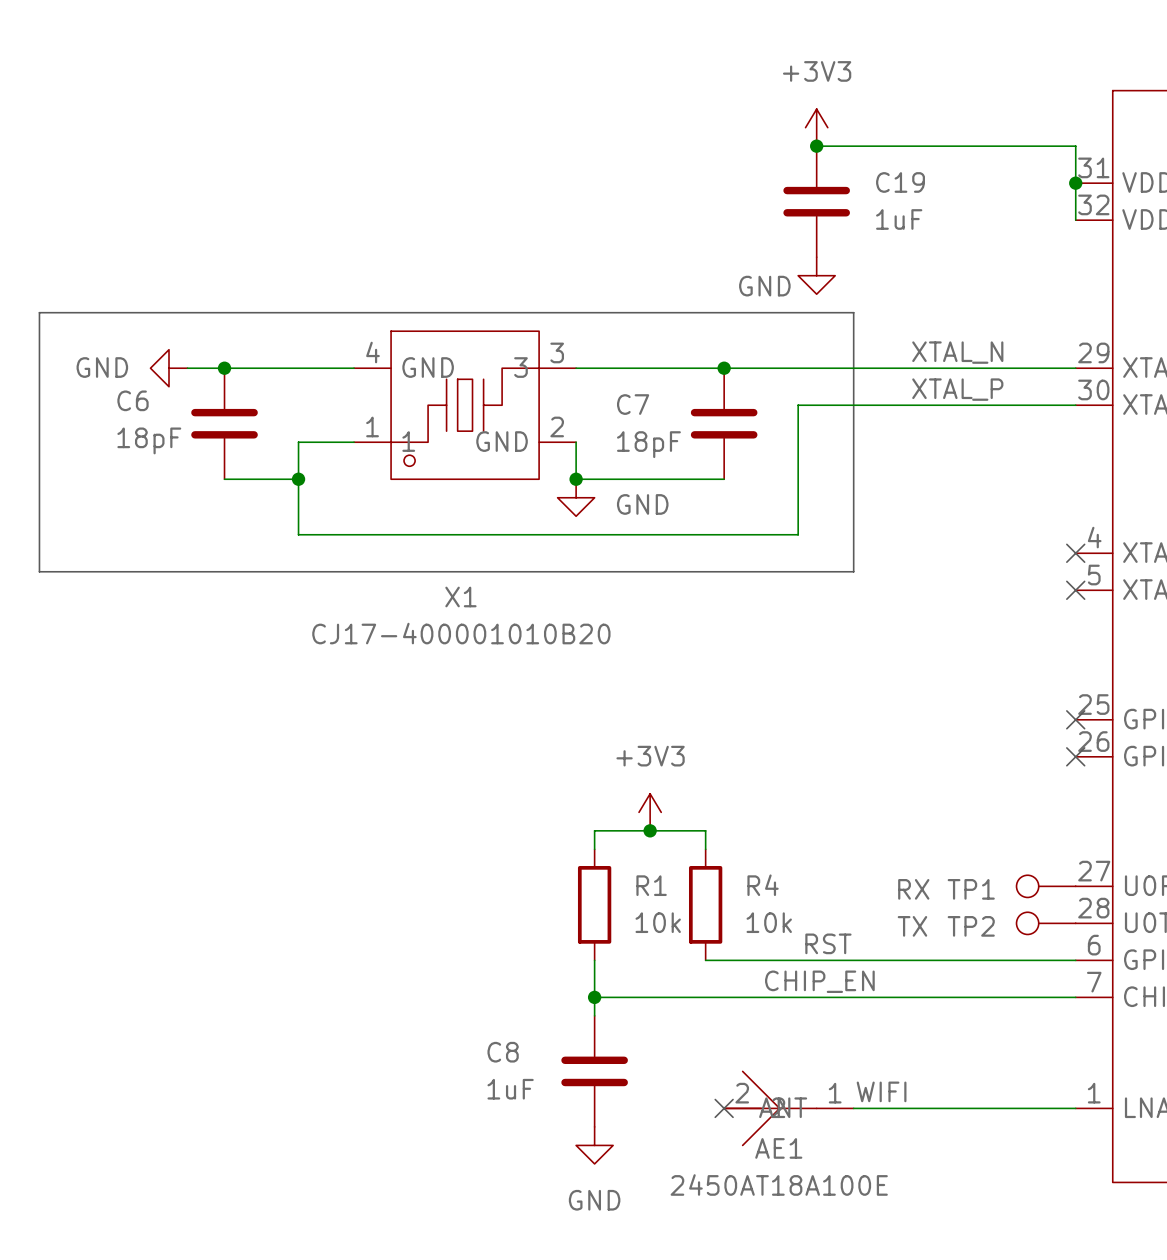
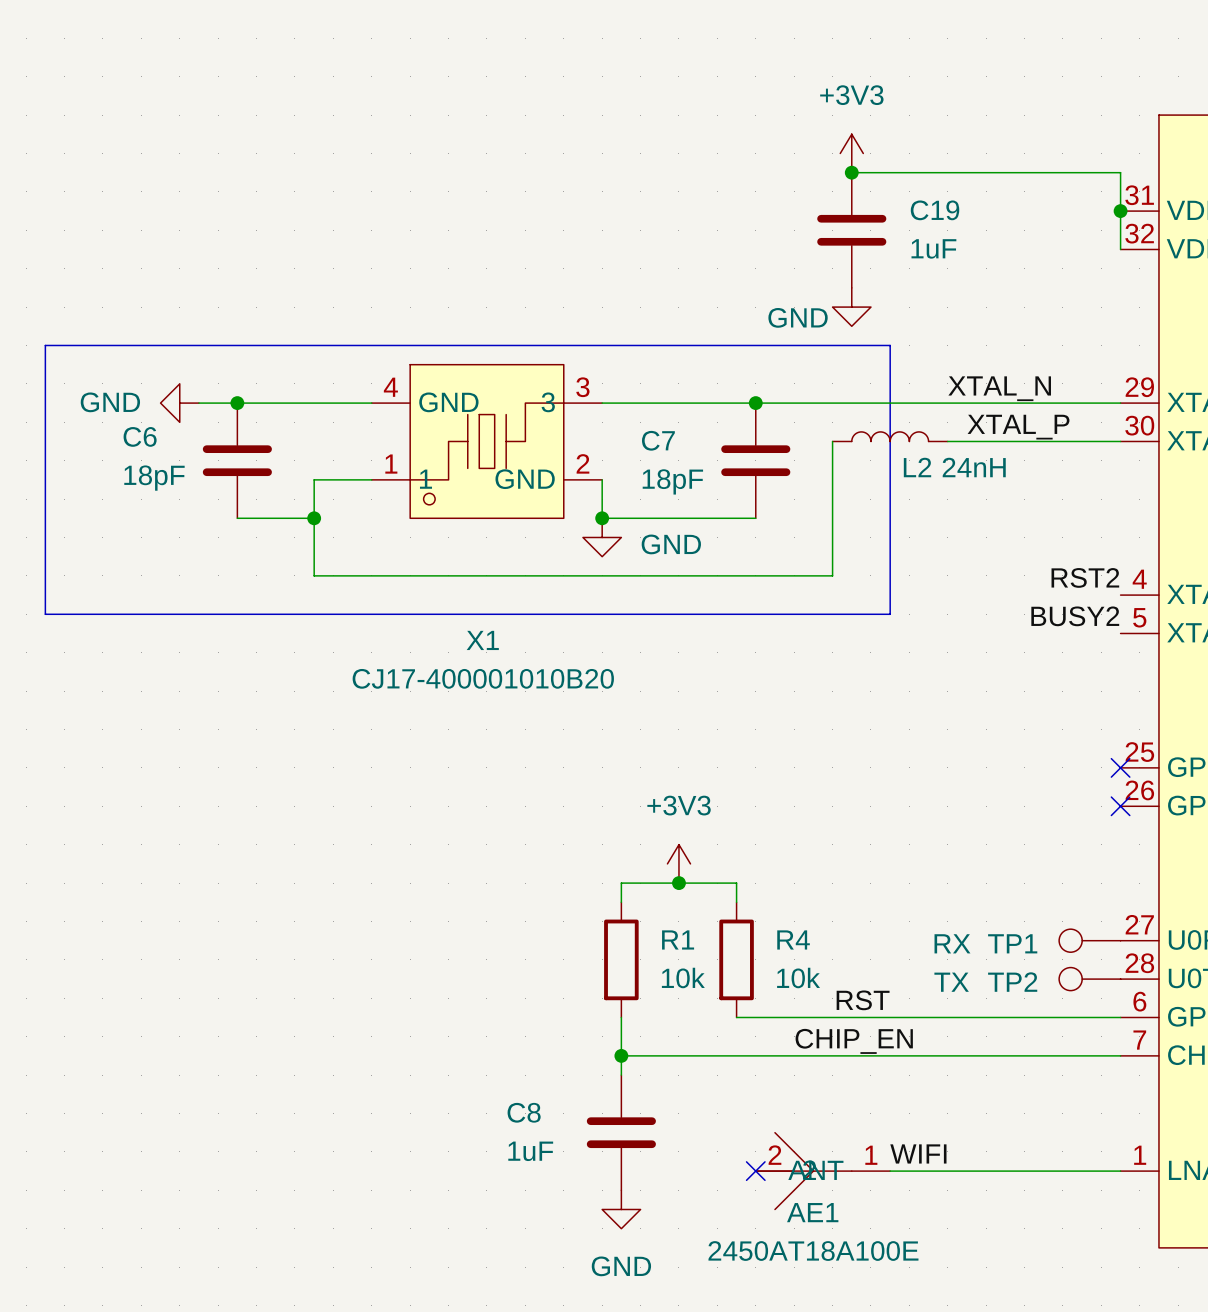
label position: XTAL_P (957, 389) -> XTAL_P (1018, 427)
L2: none -> 24nH (890, 436)
wire: (798, 405) (909, 405) -> none
label: none -> RST2 (1085, 577)
no-connect mark: (1075, 553) -> none
label: none -> BUSY2 (1075, 616)
no-connect mark: (1075, 590) -> none

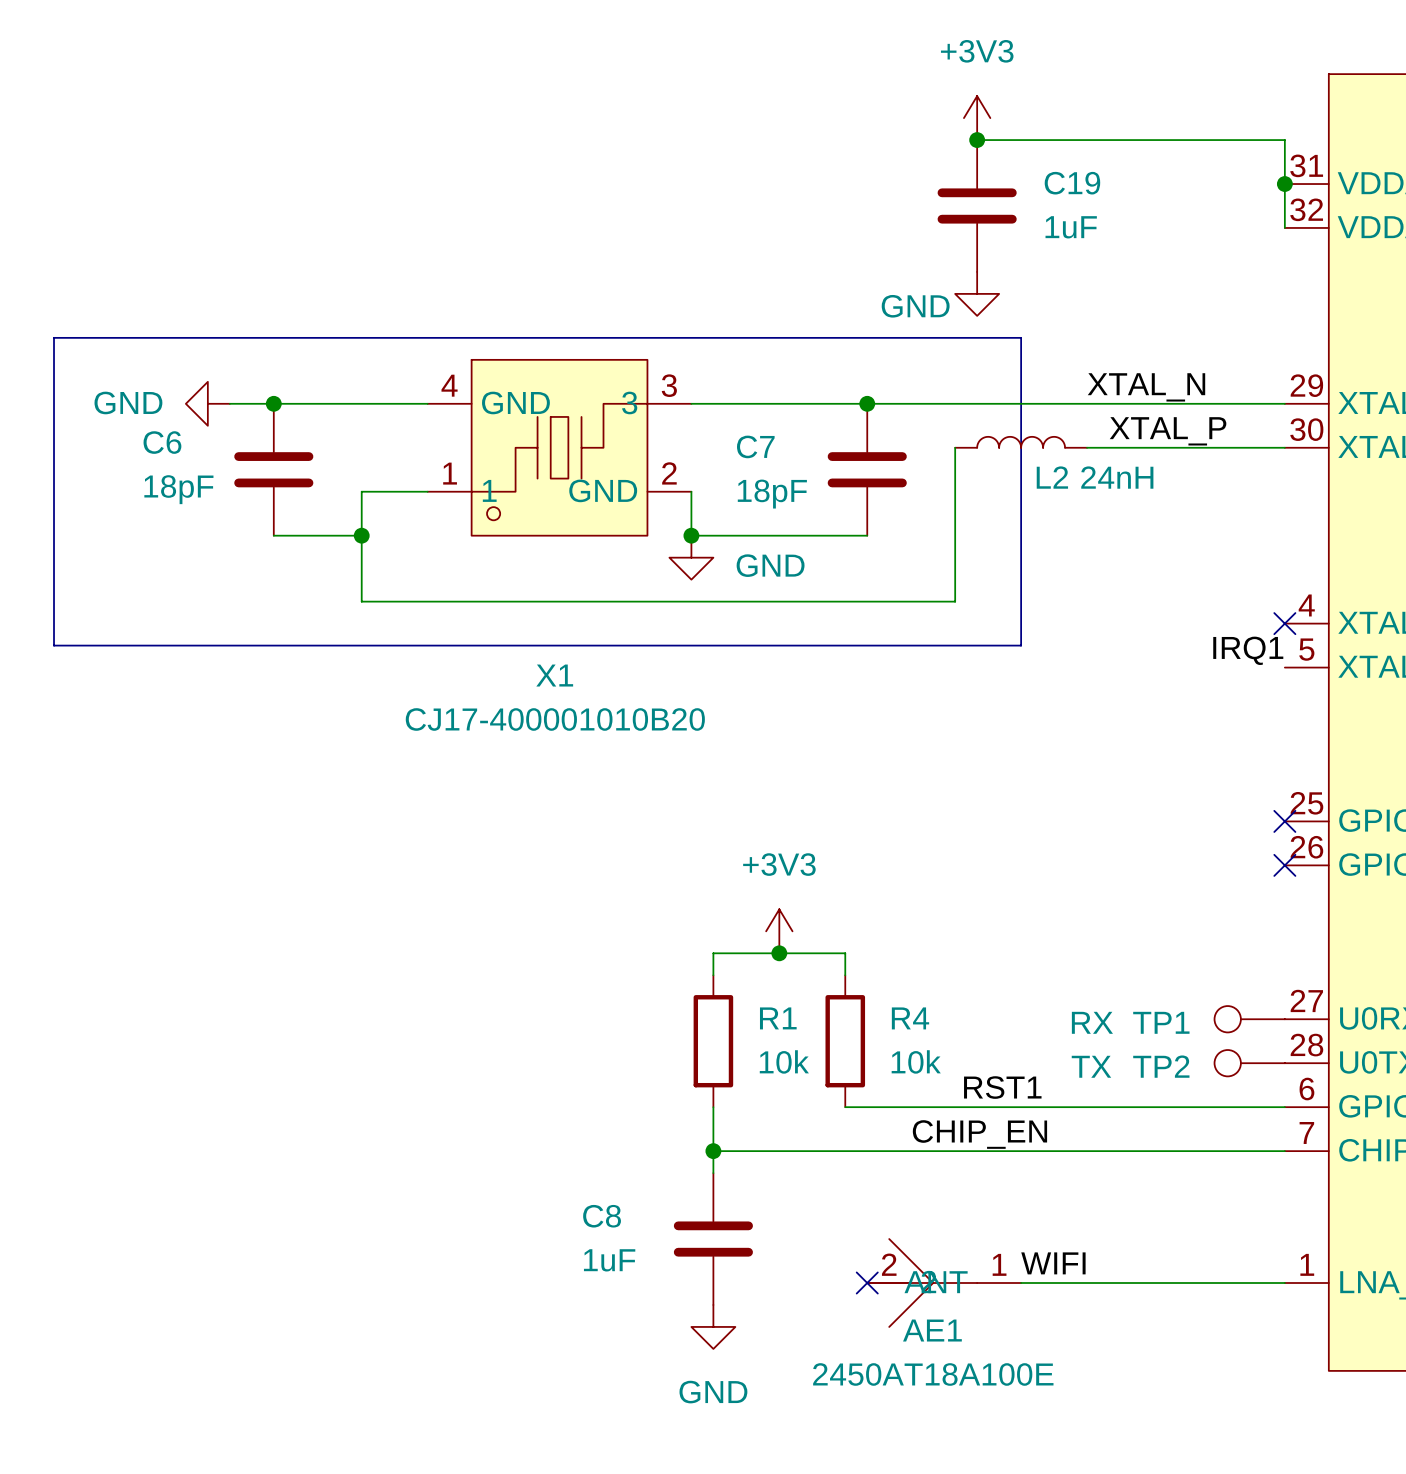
label: RST2 (1085, 577) -> none
no-connect mark: none -> (1284, 623)
label: BUSY2 (1075, 616) -> IRQ1 (1248, 650)
label: RST (863, 1000) -> RST1 (1002, 1087)

